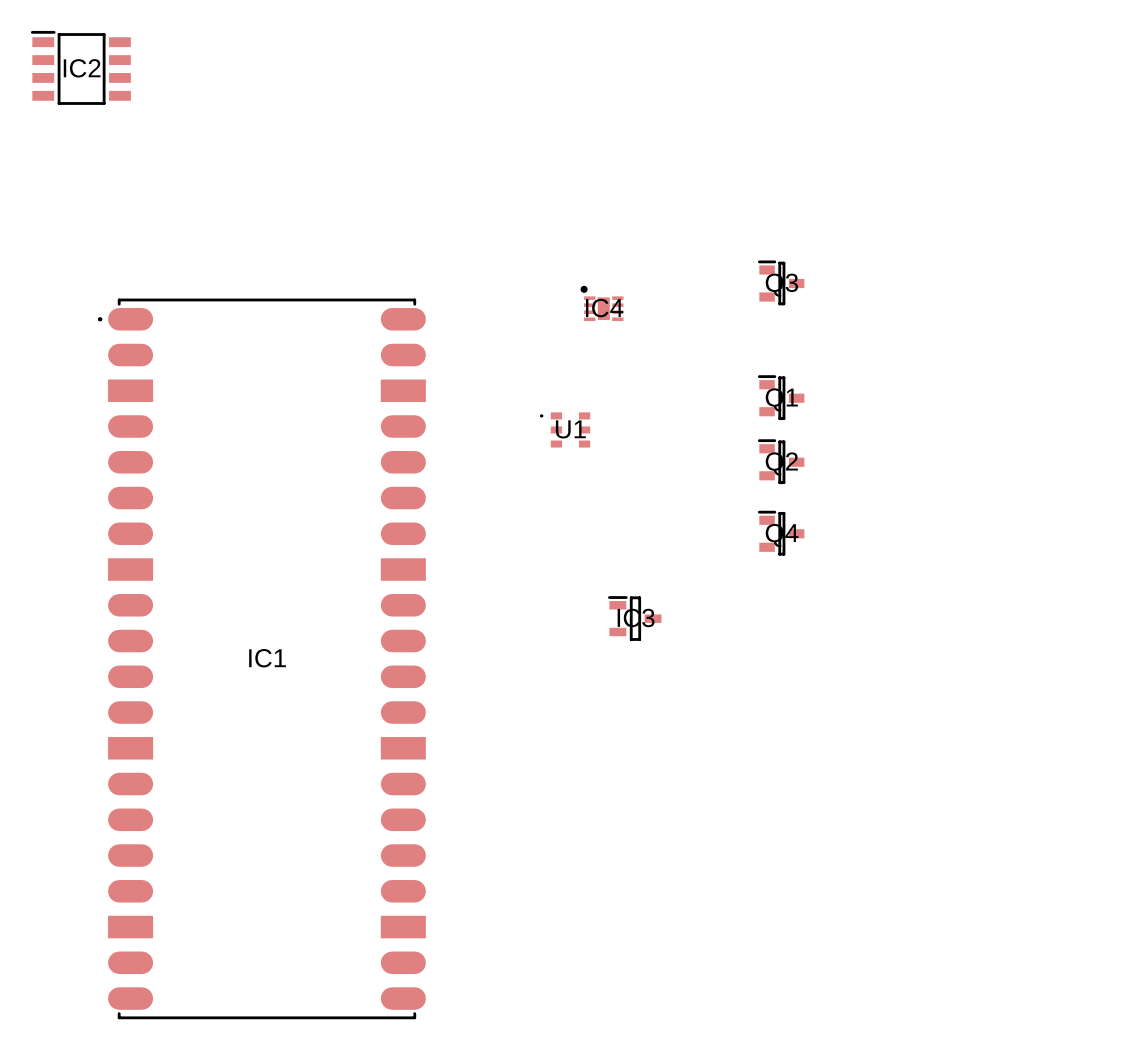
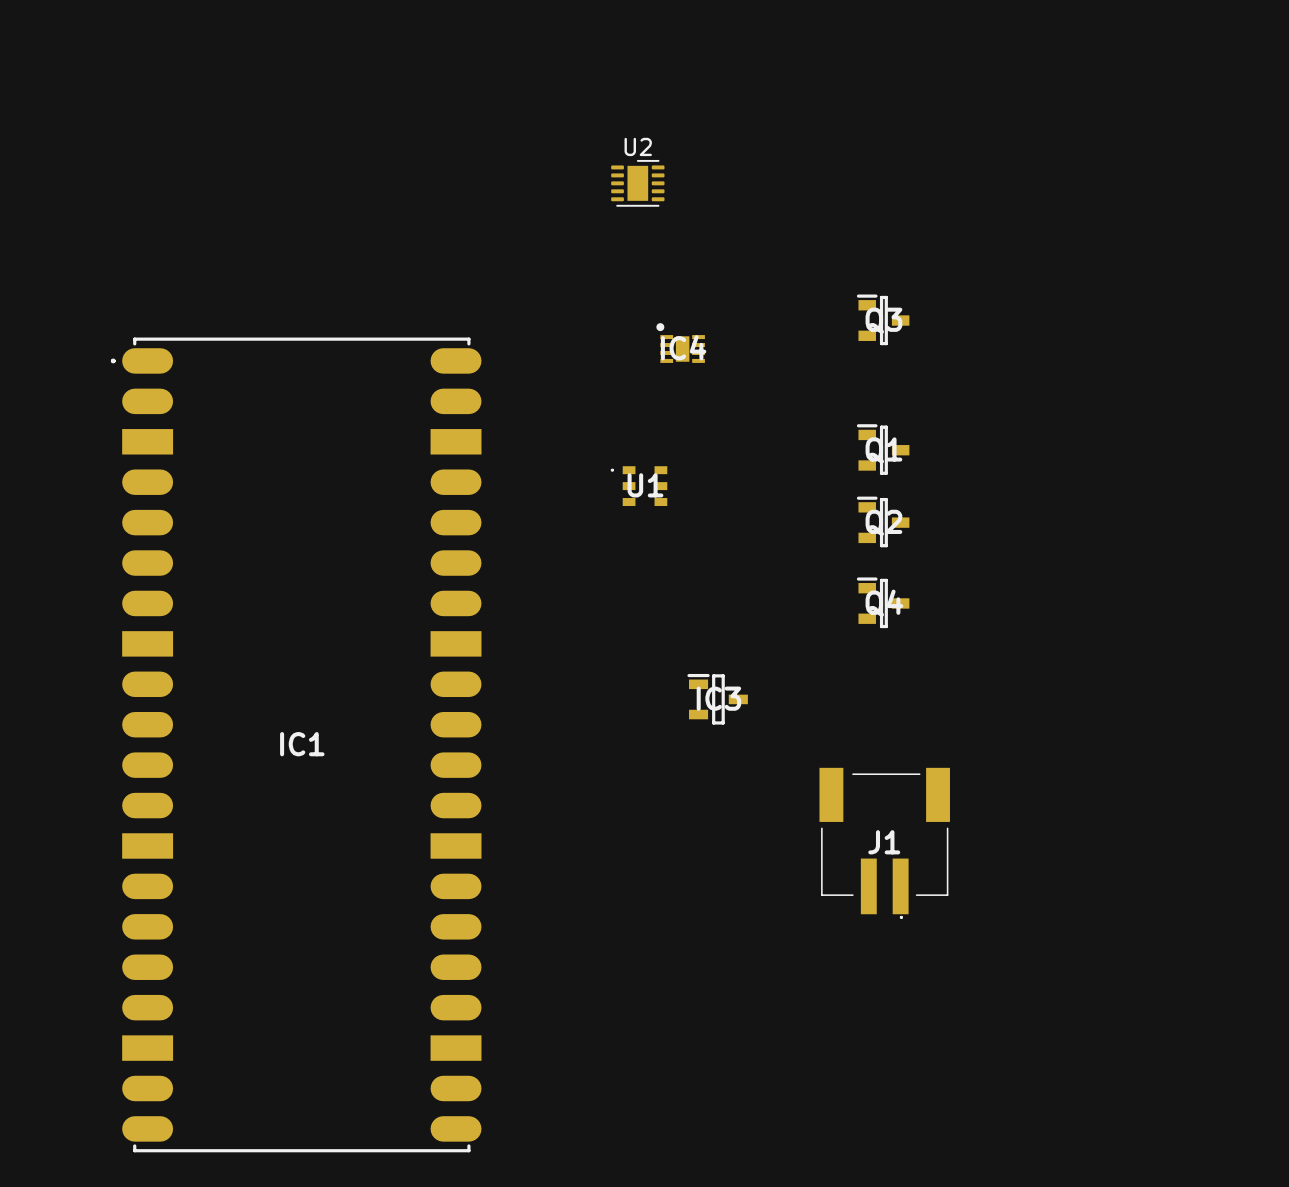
IC2: (80, 67) -> none
U2: none -> (637, 183)
J1: none -> (884, 843)

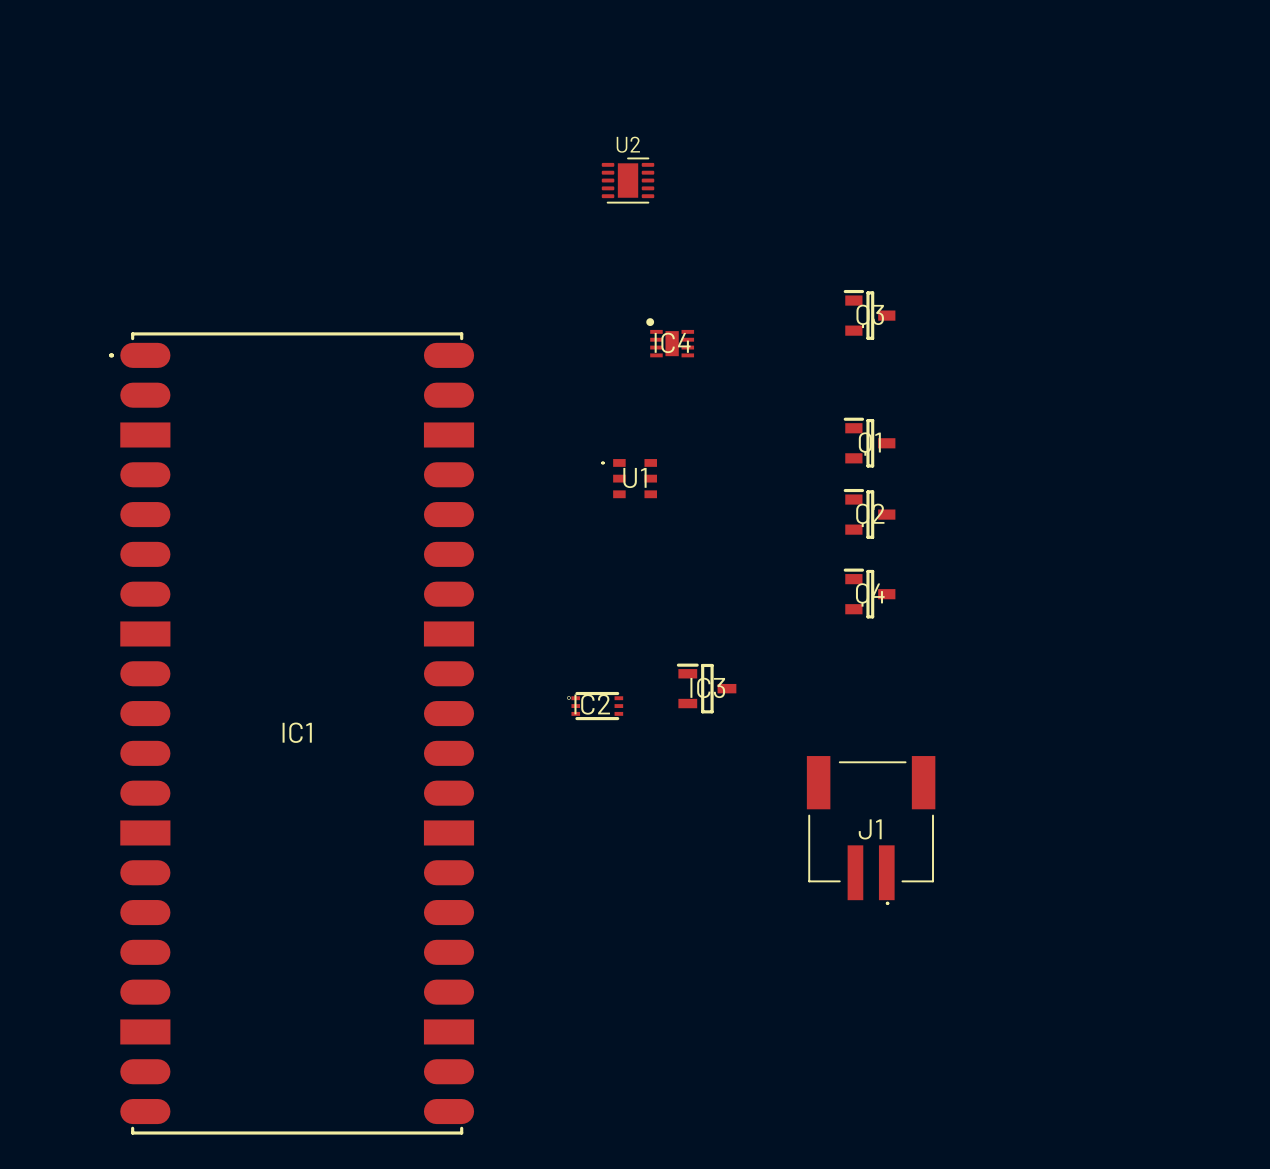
IC2: none -> (595, 706)

